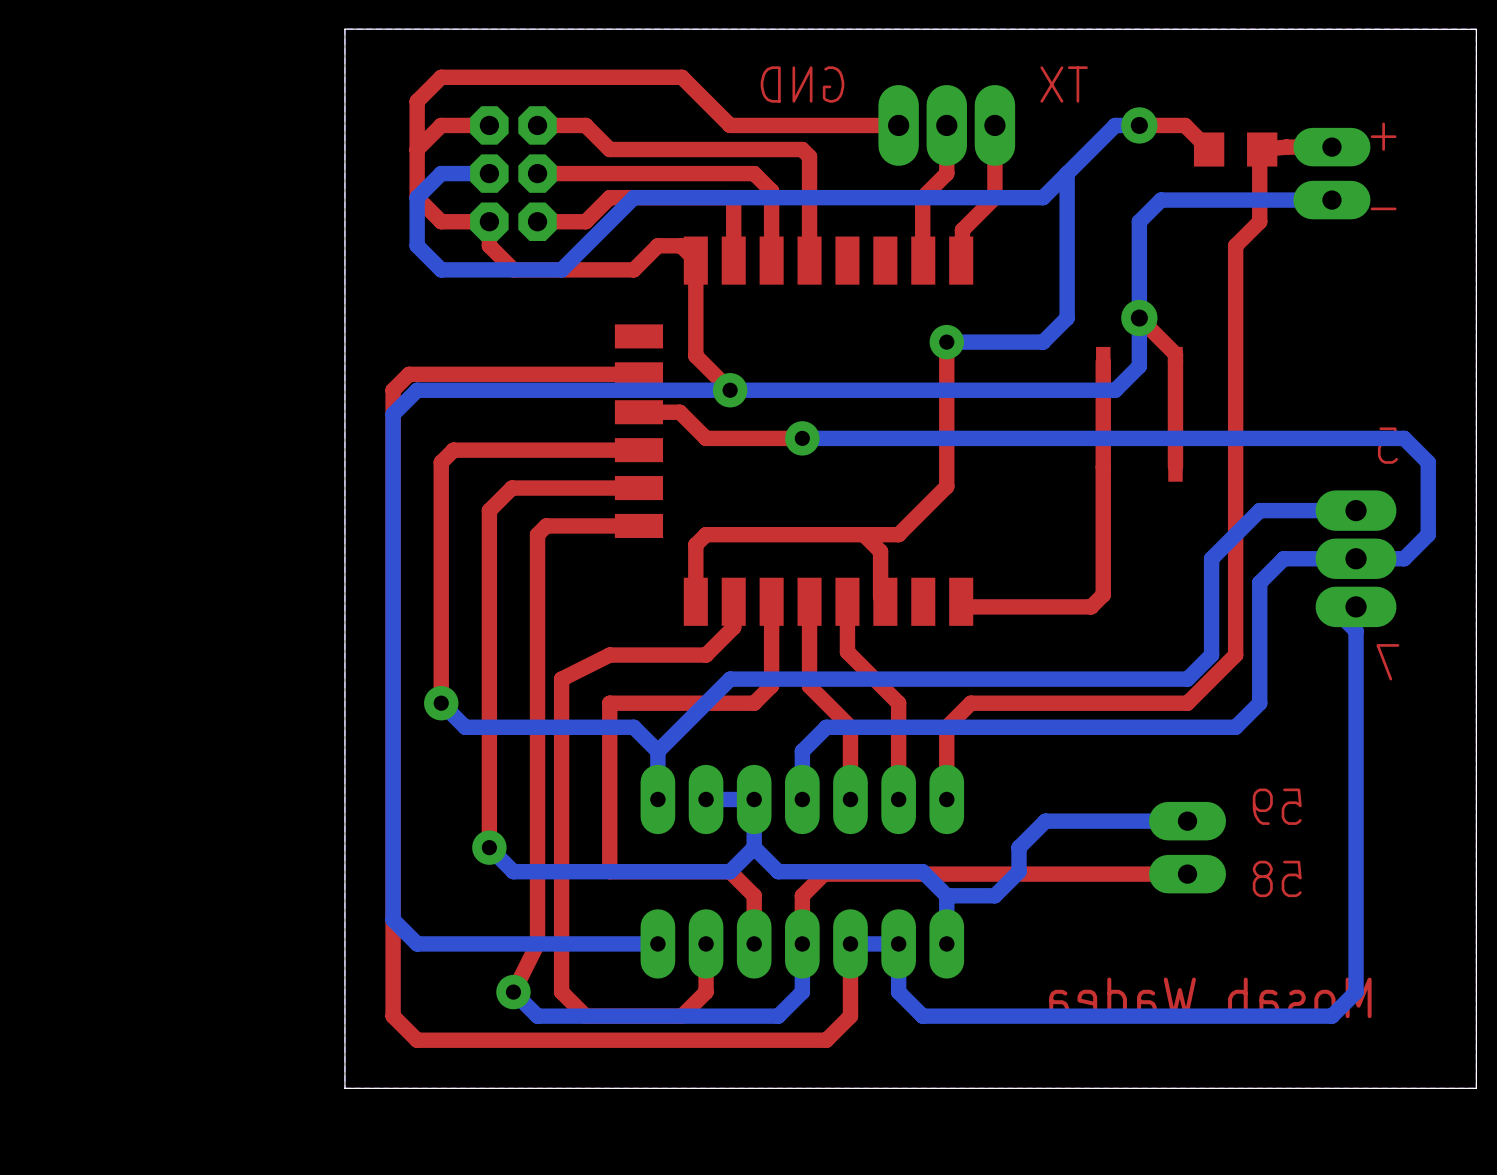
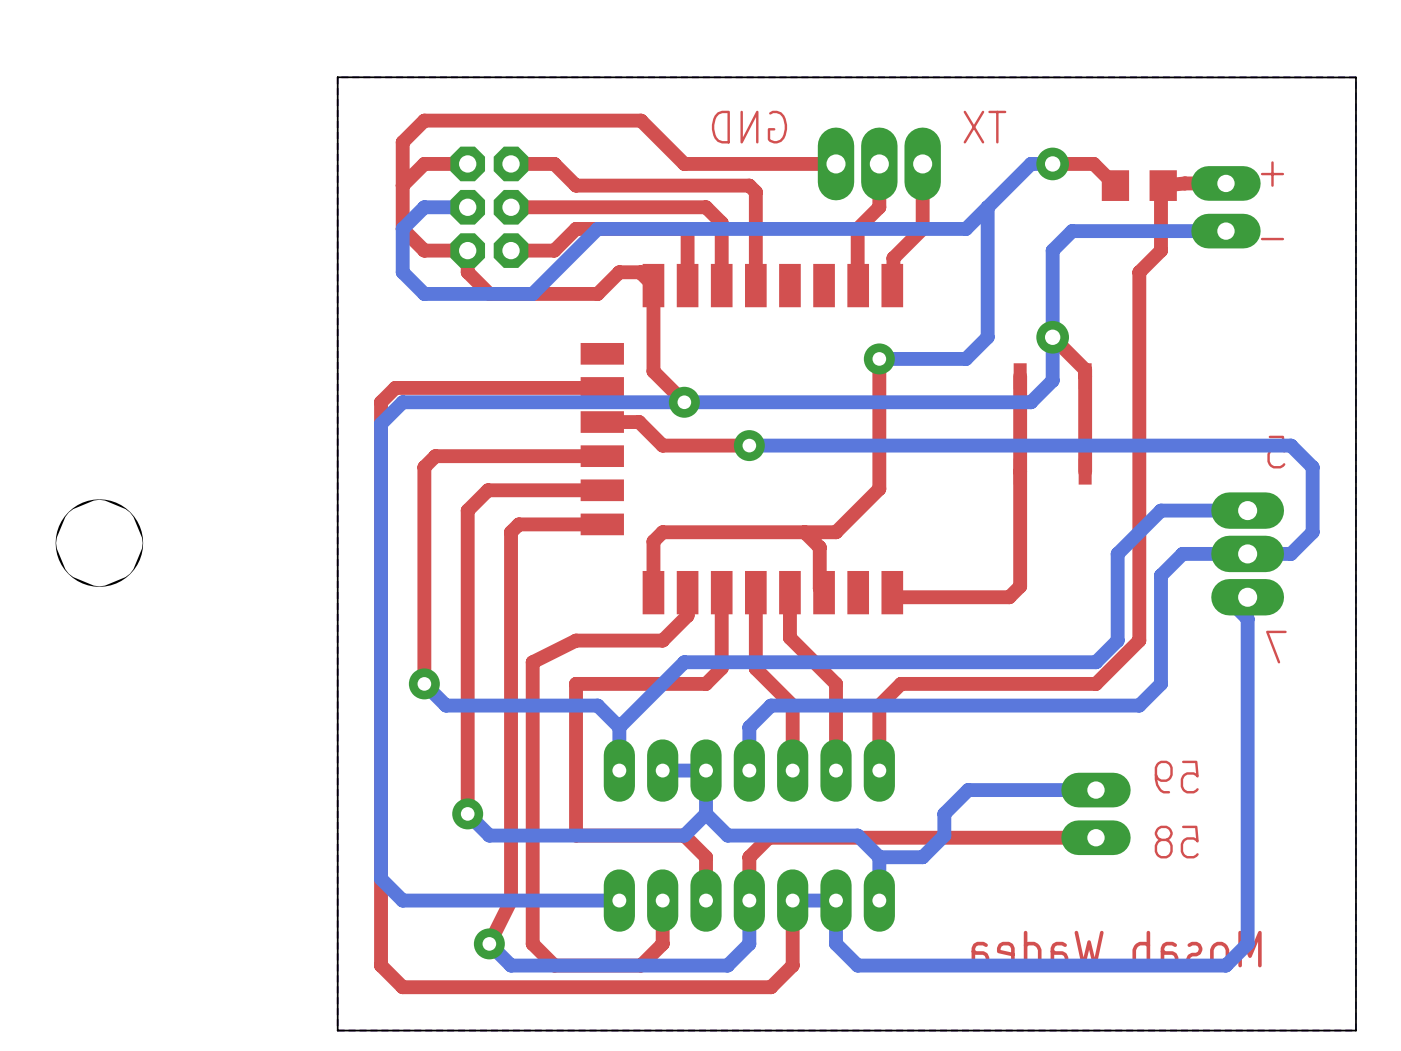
round board edge: none -> [55, 499, 144, 587]

